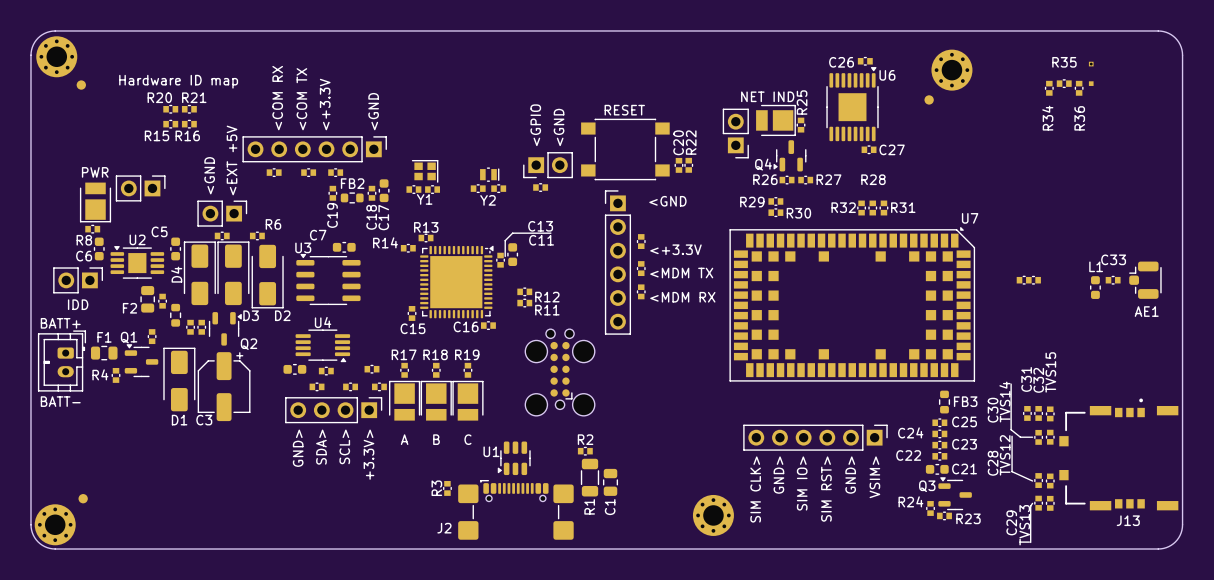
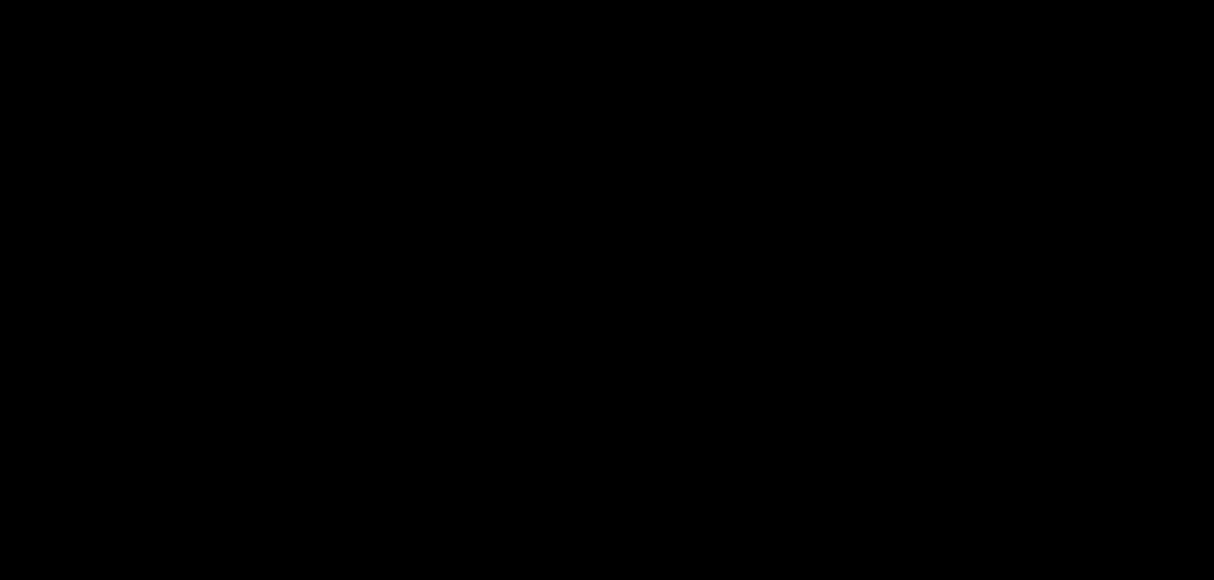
board edge: (55, 30) (1158, 30) (1168, 33) (1178, 42) (1182, 55) (1182, 524) (1180, 535) (1171, 545) (1158, 549) (55, 549) (44, 546) (34, 537) (30, 524) (30, 55) (33, 44) (38, 38) (47, 32) (55, 30) -> none
part: (56, 56) -> none
C26: (865, 61) -> none
part: (951, 70) -> none
part: (1091, 73) -> none
text: Hardware ID map (178, 81) -> none
R35: (1064, 83) -> none
part: (81, 85) -> none
R34: (1049, 88) -> none
R36: (1079, 88) -> none
text: NET IND (767, 96) -> none
text: <COM RX (277, 98) -> none
text: <COM TX (301, 99) -> none
part: (929, 99) -> none
text: <+3.3V (325, 104) -> none
U6: (852, 104) -> none
R20: (170, 109) -> none
R21: (189, 109) -> none
text: RESET (624, 110) -> none
text: <GND (373, 111) -> none
part: (775, 120) -> none
R15: (170, 124) -> none
R16: (189, 124) -> none
text: <GPIO (535, 125) -> none
R25: (801, 125) -> none
text: <GND (559, 127) -> none
part: (735, 133) -> none
part: (314, 149) -> none
part: (625, 149) -> none
C27: (869, 149) -> none
Q4: (789, 155) -> none
text: <EXT +5V (232, 160) -> none
part: (548, 165) -> none
C20: (678, 165) -> none
R22: (688, 165) -> none
Y1: (425, 171) -> none
text: PWR (95, 172) -> none
part: (274, 172) -> none
part: (308, 172) -> none
part: (335, 172) -> none
Y2: (489, 174) -> none
text: <GND (209, 175) -> none
R26: (787, 180) -> none
R27: (805, 180) -> none
part: (540, 187) -> none
part: (140, 188) -> none
part: (478, 188) -> none
part: (498, 188) -> none
part: (413, 189) -> none
part: (432, 189) -> none
C17: (384, 190) -> none
C19: (332, 193) -> none
C18: (371, 193) -> none
FB2: (352, 197) -> none
text: <GND (667, 201) -> none
R29: (775, 201) -> none
part: (95, 202) -> none
R32: (861, 208) -> none
R28: (872, 208) -> none
R31: (883, 208) -> none
R30: (775, 212) -> none
part: (222, 213) -> none
R8: (92, 229) -> none
line: (550, 233) (512, 233) (505, 240) (505, 256) -> none
part: (222, 235) -> none
R6: (257, 235) -> none
R13: (426, 238) -> none
part: (641, 241) -> none
C7: (344, 247) -> none
C6: (99, 248) -> none
C5: (175, 248) -> none
R14: (408, 248) -> none
text: <+3.3V (675, 249) -> none
C11: (512, 254) -> none
C13: (500, 260) -> none
U2: (137, 262) -> none
part: (617, 262) -> none
part: (641, 268) -> none
D4: (199, 273) -> none
D3: (233, 273) -> none
text: <MDM TX (681, 273) -> none
D2: (267, 276) -> none
U3: (328, 279) -> none
part: (78, 280) -> none
part: (1028, 280) -> none
C33: (1113, 280) -> none
AE1: (1145, 280) -> none
part: (456, 281) -> none
L1: (1095, 287) -> none
R12: (524, 291) -> none
part: (641, 291) -> none
text: <MDM RX (682, 297) -> none
F2: (147, 299) -> none
part: (162, 301) -> none
R11: (524, 303) -> none
text: IDD (78, 304) -> none
U7: (852, 304) -> none
C15: (412, 313) -> none
part: (175, 315) -> none
text: BATT+ (60, 323) -> none
C16: (488, 325) -> none
part: (190, 327) -> none
part: (201, 327) -> none
Q2: (225, 328) -> none
part: (152, 336) -> none
U4: (322, 345) -> none
F1: (104, 353) -> none
part: (61, 360) -> none
Q1: (141, 360) -> none
part: (294, 369) -> none
part: (371, 369) -> none
R17: (404, 370) -> none
R18: (436, 370) -> none
R19: (467, 370) -> none
part: (326, 371) -> none
part: (560, 372) -> none
R4: (116, 375) -> none
D1: (179, 379) -> none
line: (1011, 384) (1011, 429) (1020, 437) (1032, 437) -> none
C3: (224, 386) -> none
part: (317, 386) -> none
part: (350, 386) -> none
part: (379, 386) -> none
part: (404, 400) -> none
part: (436, 400) -> none
part: (467, 400) -> none
text: BATT- (60, 401) -> none
FB3: (944, 402) -> none
part: (333, 410) -> none
C31: (1027, 413) -> none
C32: (1038, 413) -> none
TVS15: (1050, 413) -> none
C25: (939, 422) -> none
C24: (939, 433) -> none
line: (1012, 436) (1012, 471) (1032, 480) -> none
part: (815, 437) -> none
C30: (1038, 437) -> none
TVS14: (1050, 437) -> none
text: A (404, 439) -> none
text: B (436, 439) -> none
text: C (467, 439) -> none
C23: (939, 445) -> none
text: SCL> (344, 446) -> none
text: SDA> (321, 447) -> none
text: GND> (298, 448) -> none
R2: (585, 451) -> none
text: +3.3V> (368, 454) -> none
J13: (1118, 454) -> none
C22: (939, 456) -> none
U1: (514, 458) -> none
C21: (937, 469) -> none
text: GND> (778, 475) -> none
text: GND> (850, 475) -> none
R1: (590, 477) -> none
text: VSIM> (874, 477) -> none
C28: (1038, 480) -> none
TVS12: (1050, 480) -> none
C1: (610, 482) -> none
text: SIM IO> (802, 483) -> none
R3: (447, 488) -> none
text: SIM CLK> (755, 489) -> none
text: SIM RST> (826, 489) -> none
Q3: (955, 493) -> none
part: (83, 498) -> none
line: (1032, 503) (1030, 506) (1030, 542) -> none
C29: (1038, 503) -> none
TVS13: (1050, 503) -> none
R24: (930, 508) -> none
J2: (515, 509) -> none
part: (713, 515) -> none
R23: (944, 515) -> none
part: (55, 524) -> none

